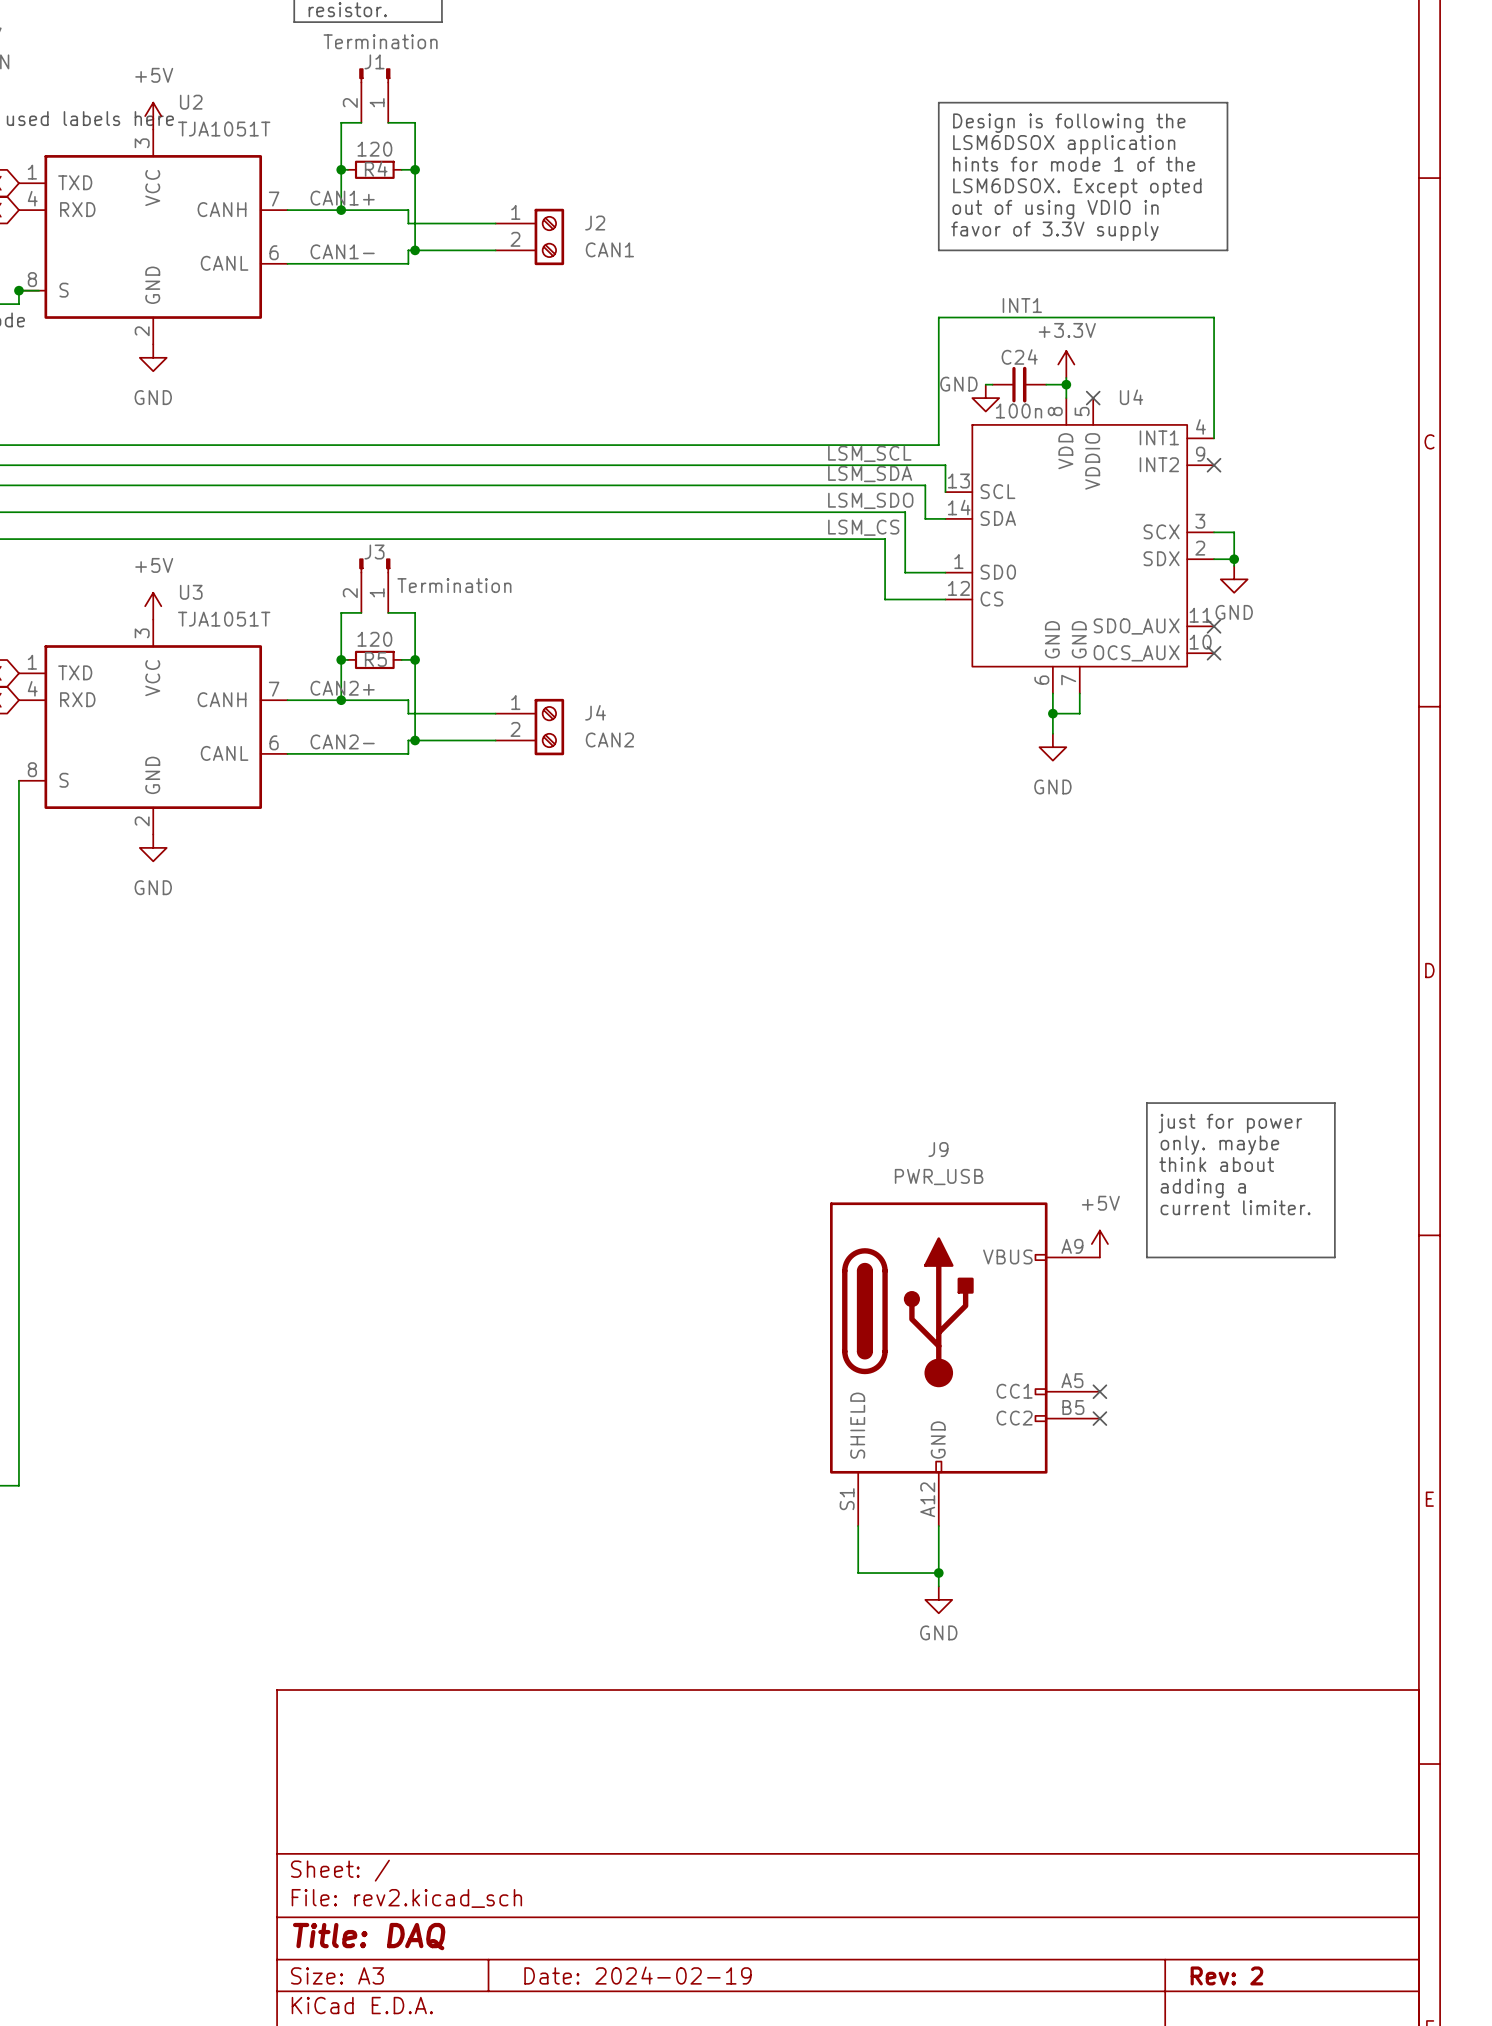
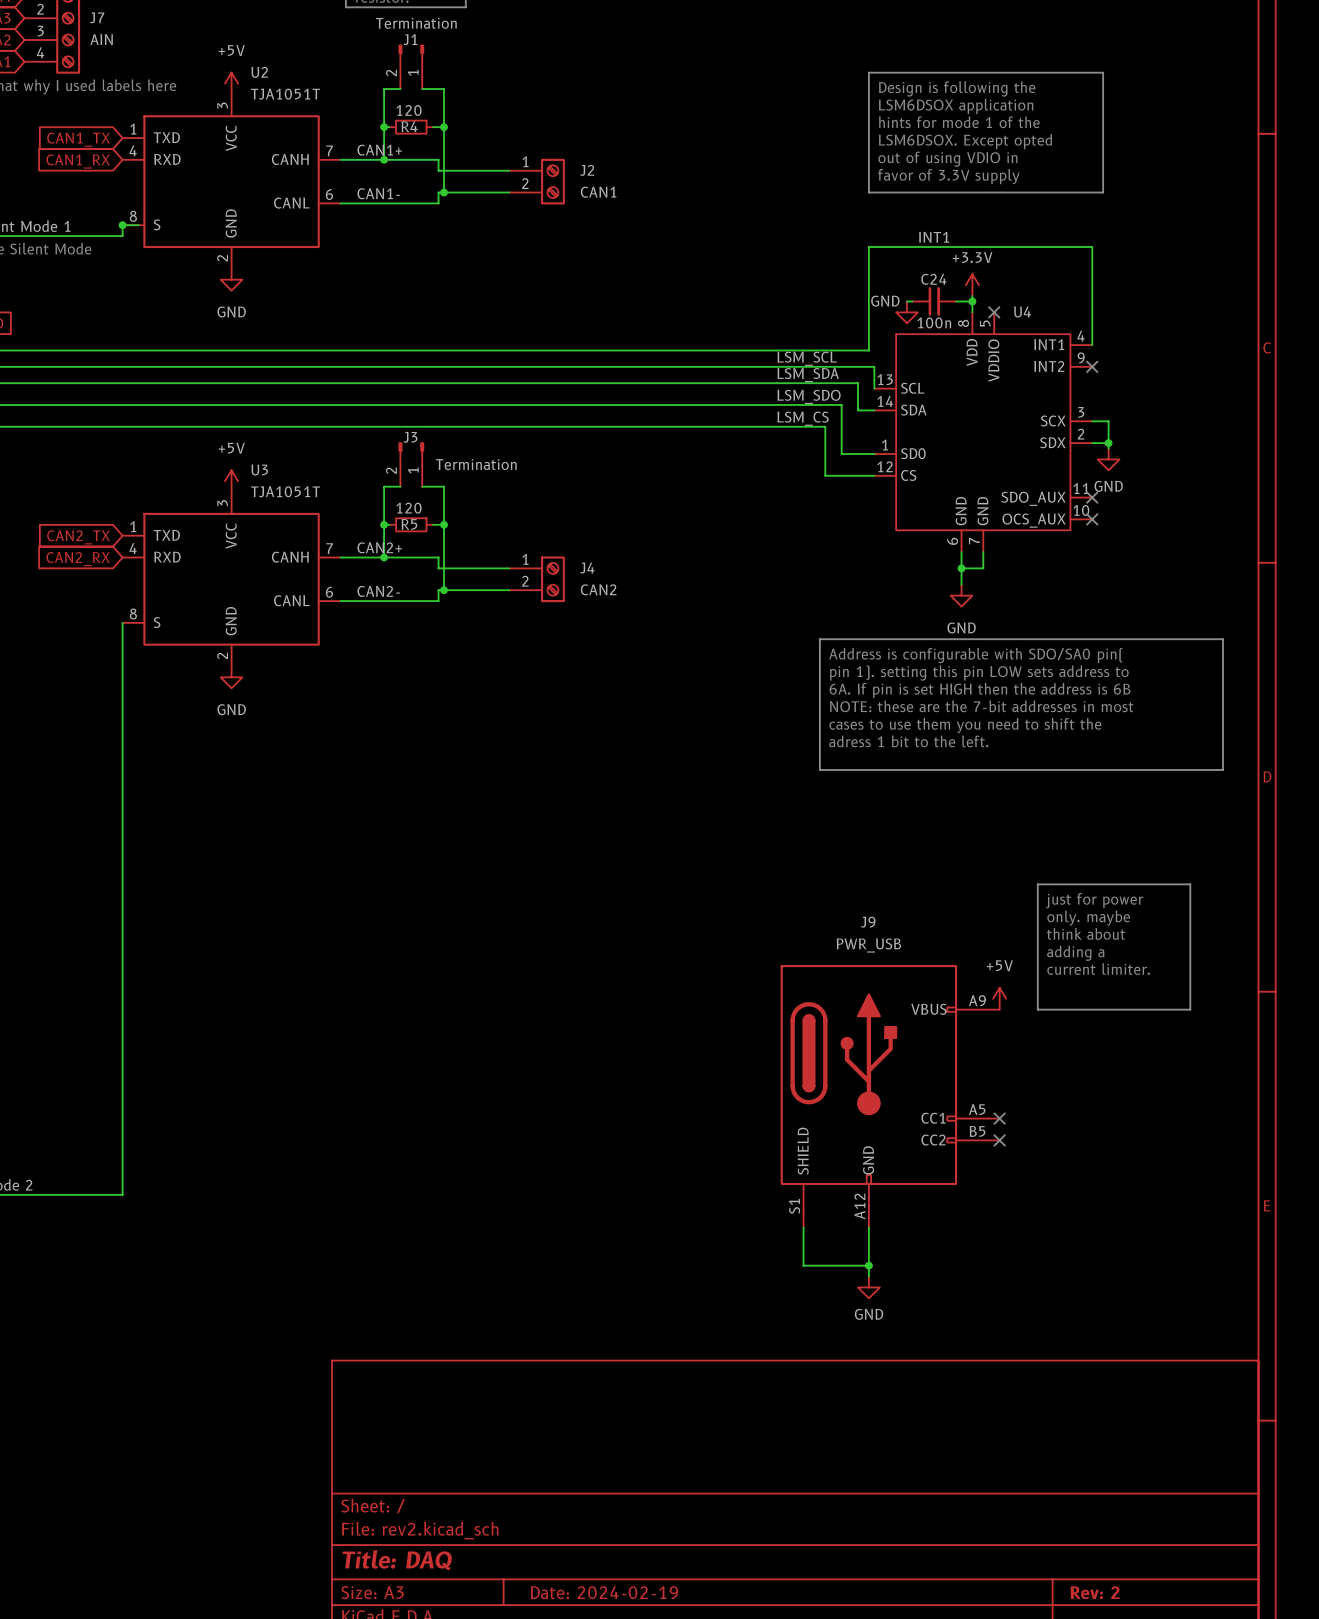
line: none -> (819, 639) (1222, 639) (1222, 769) (819, 769) (819, 639)
text: none -> Address is configurable with SDO/SA0 pin( (975, 655)
text: none -> pin 1). setting this pin LOW sets address to (979, 673)
text: none -> 6A. If pin is set HIGH then the address is 6B (980, 690)
text: none -> NOTE: these are the 7-bit addresses in most (981, 706)
text: none -> cases to use them you need to shift the (965, 725)
text: none -> adress 1 bit to the left. (908, 741)

